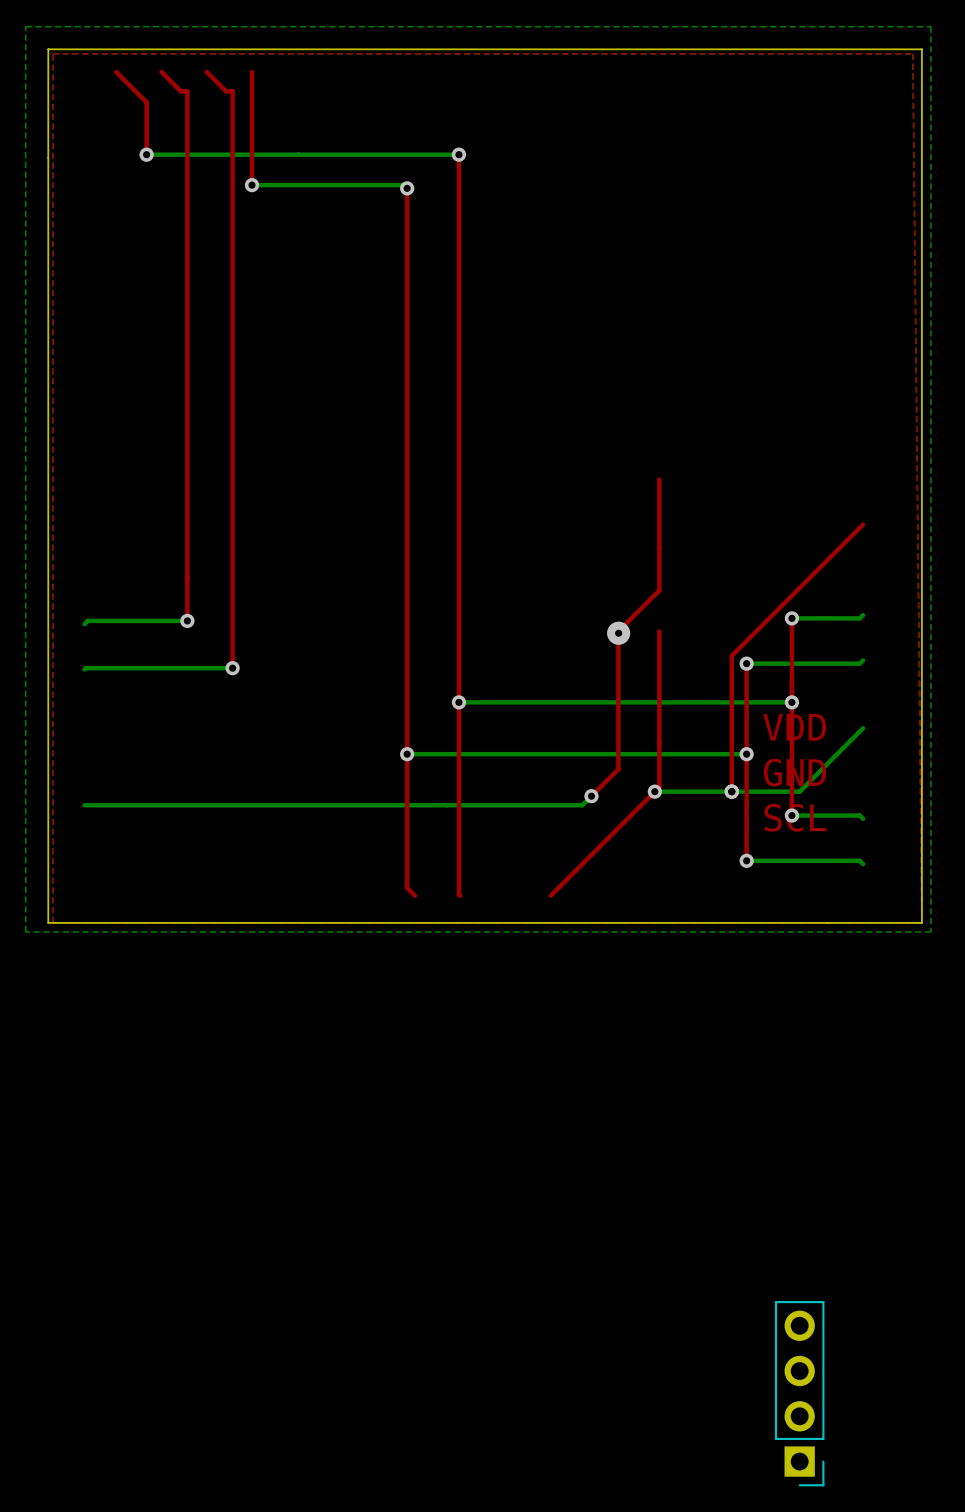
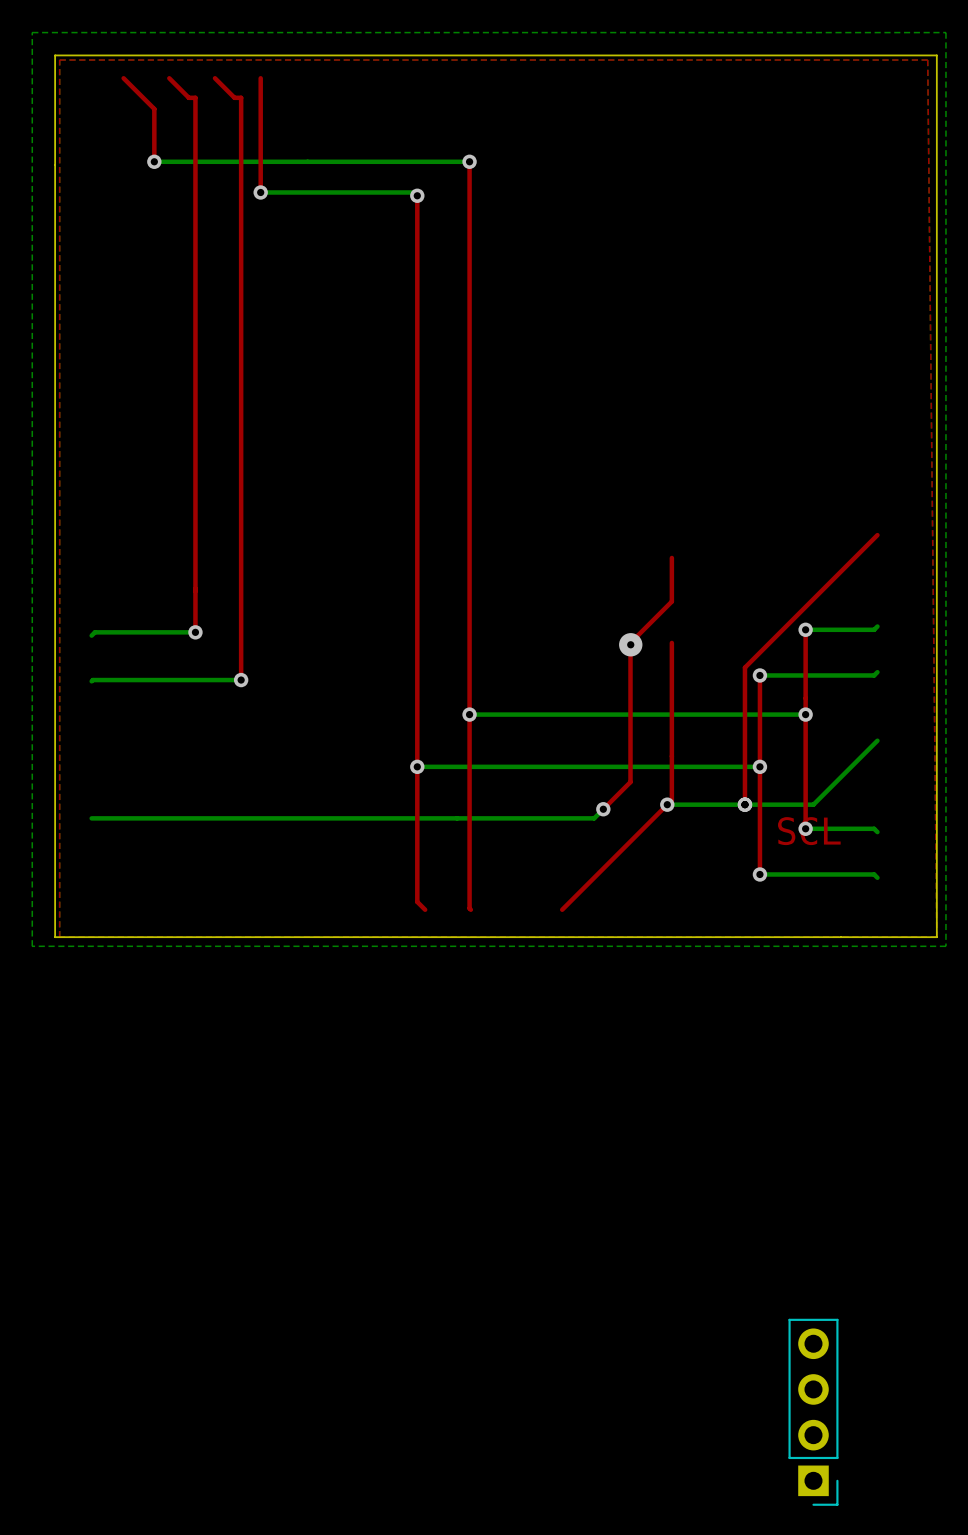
top track: (659, 479) (659, 547) -> none
text: VDD (794, 727) -> none
text: GND (794, 772) -> none

